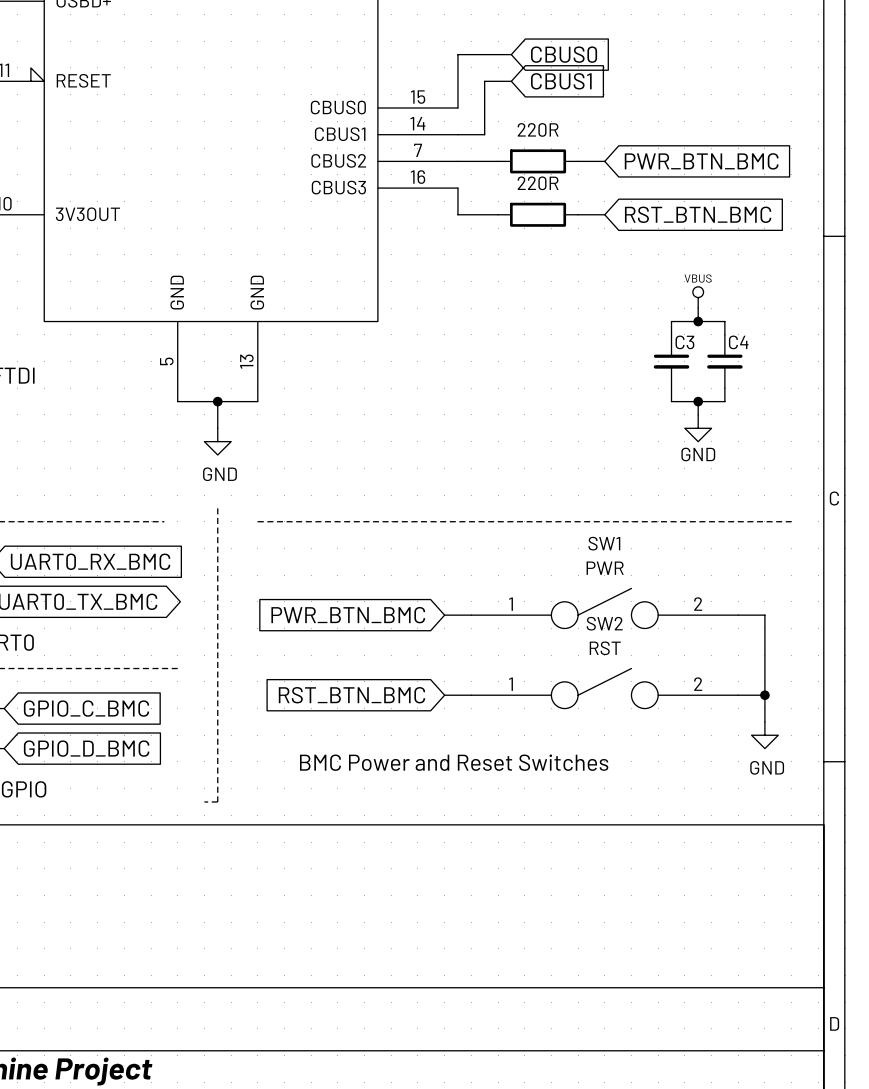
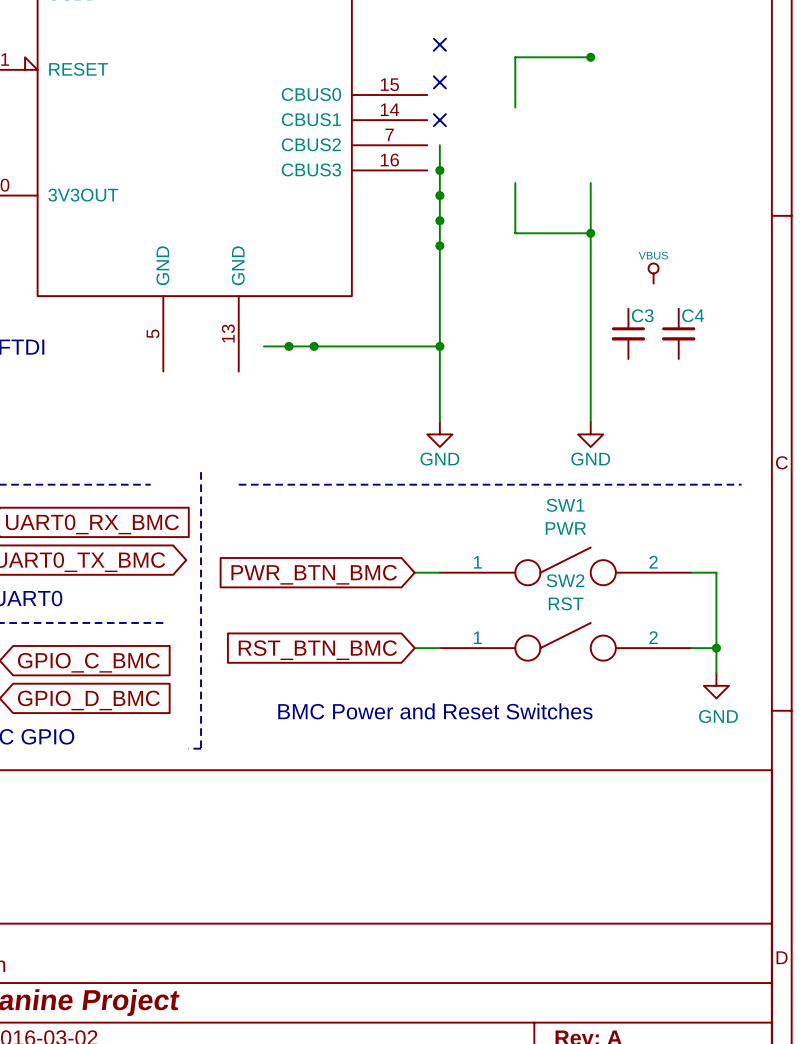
no-connect mark: none -> (439, 44)
wire: (511, 54) (457, 54) (457, 108) -> none
global label: CBUS0 (564, 54) -> none
wire: none -> (590, 57) (515, 57) (515, 107)
junction: none -> (590, 57)
wire: (511, 81) (484, 81) (484, 134) (457, 134) -> none
global label: CBUS1 (561, 81) -> none
no-connect mark: none -> (439, 82)
no-connect mark: none -> (439, 120)
wire: (457, 161) (498, 161) -> none
wire: none -> (439, 145) (439, 421)
part: 220R (538, 161) -> none
wire: (578, 161) (604, 161) -> none
global label: PWR_BTN_BMC (701, 161) -> none
wire: (457, 188) (457, 214) (498, 214) -> none
junction: none -> (439, 170)
wire: none -> (515, 183) (515, 233) (590, 233)
wire: none -> (590, 183) (590, 421)
junction: none -> (439, 195)
part: 220R (538, 214) -> none
wire: (578, 214) (604, 214) -> none
global label: RST_BTN_BMC (698, 214) -> none
junction: none -> (439, 220)
junction: none -> (590, 233)
junction: none -> (439, 245)
wire: (698, 308) (698, 321) -> none
junction: (698, 321) -> none
wire: (671, 334) (671, 321) (724, 321) (724, 334) -> none
wire: none -> (263, 346) (439, 346)
junction: none -> (289, 346)
junction: none -> (314, 346)
junction: none -> (439, 346)
wire: (671, 388) (671, 401) (724, 401) (724, 388) -> none
wire: (177, 401) (257, 401) -> none
wire: (217, 401) (217, 428) -> none
junction: (217, 401) -> none
wire: (698, 401) (698, 414) -> none
junction: (698, 401) -> none
power symbol position: GND (698, 428) -> GND (590, 434)
power symbol: GND (217, 441) -> none
power symbol: none -> GND (439, 434)

